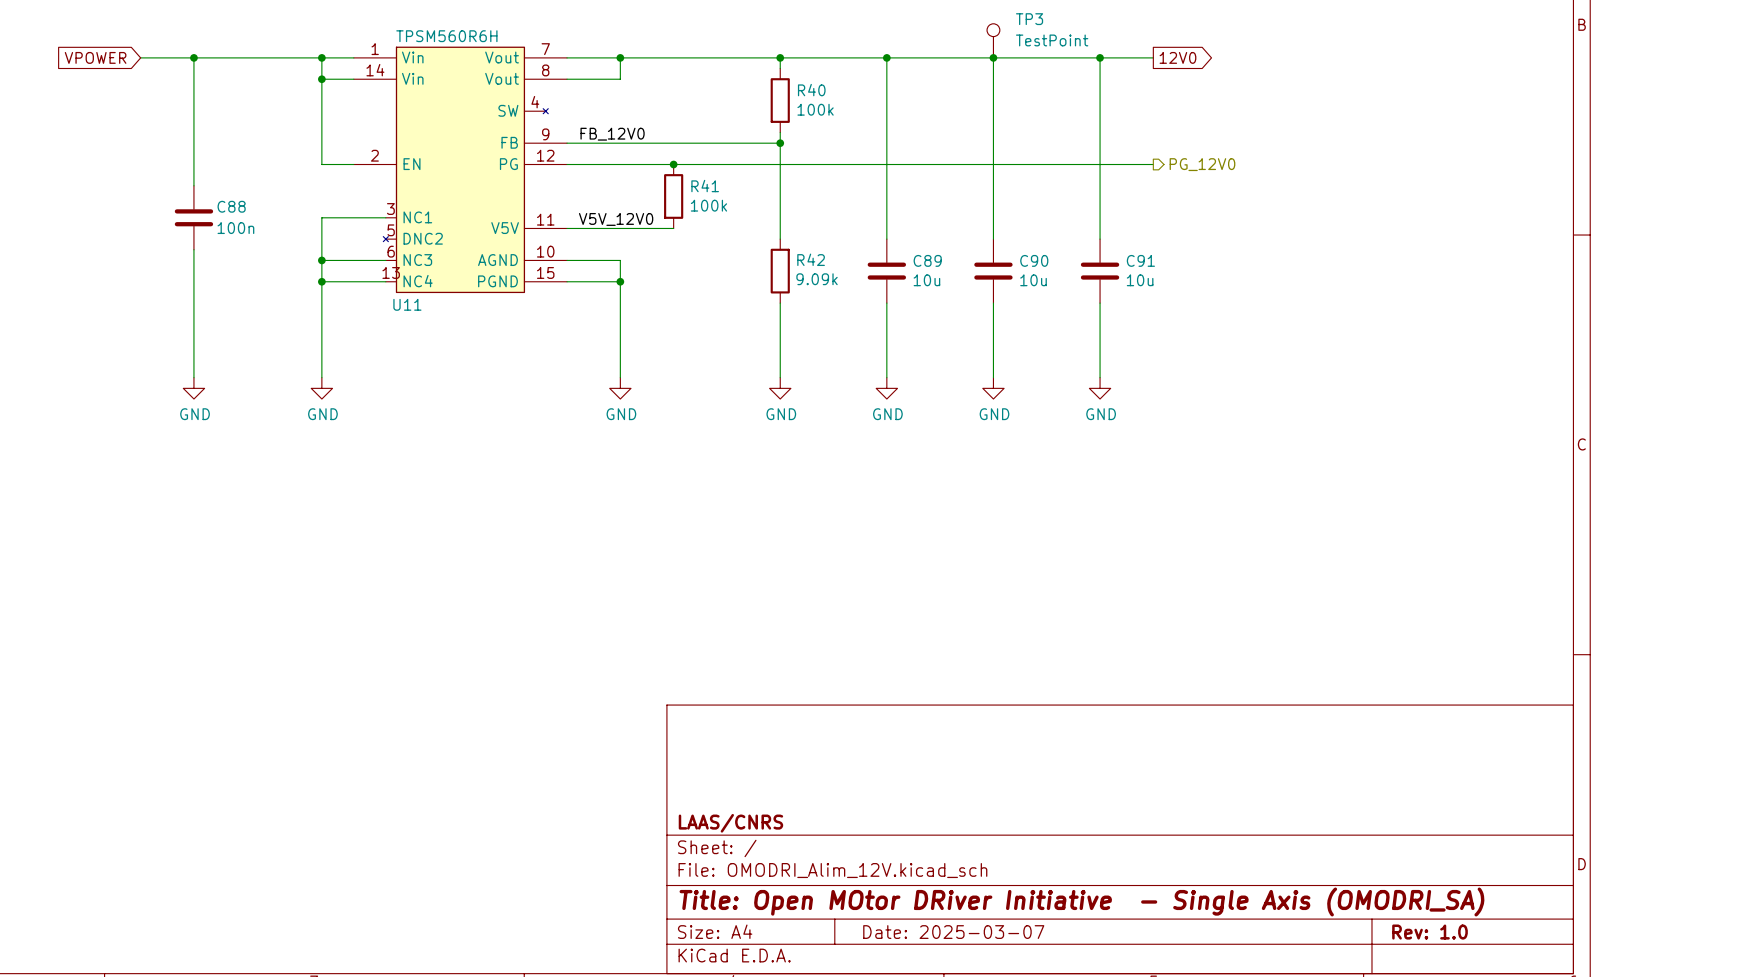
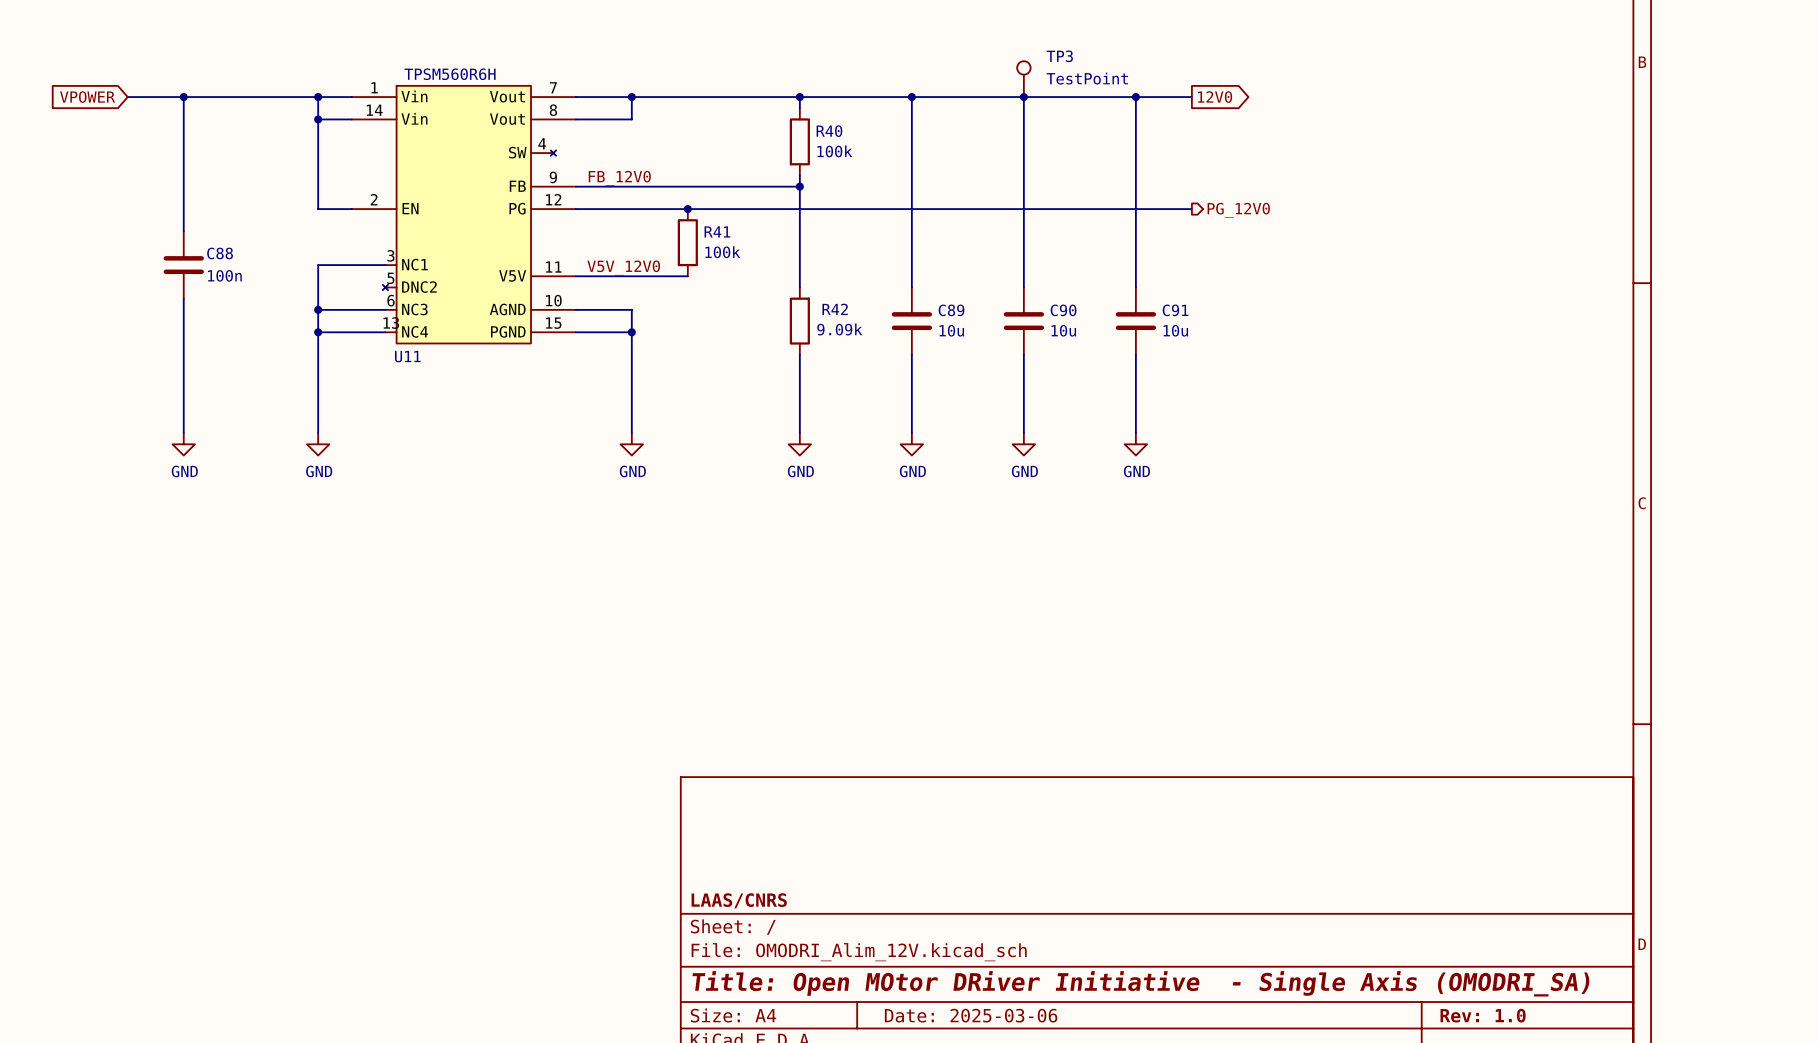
title block: Date: 2025-03-07 (953, 932) -> Date: 2025-03-06 (971, 1015)

